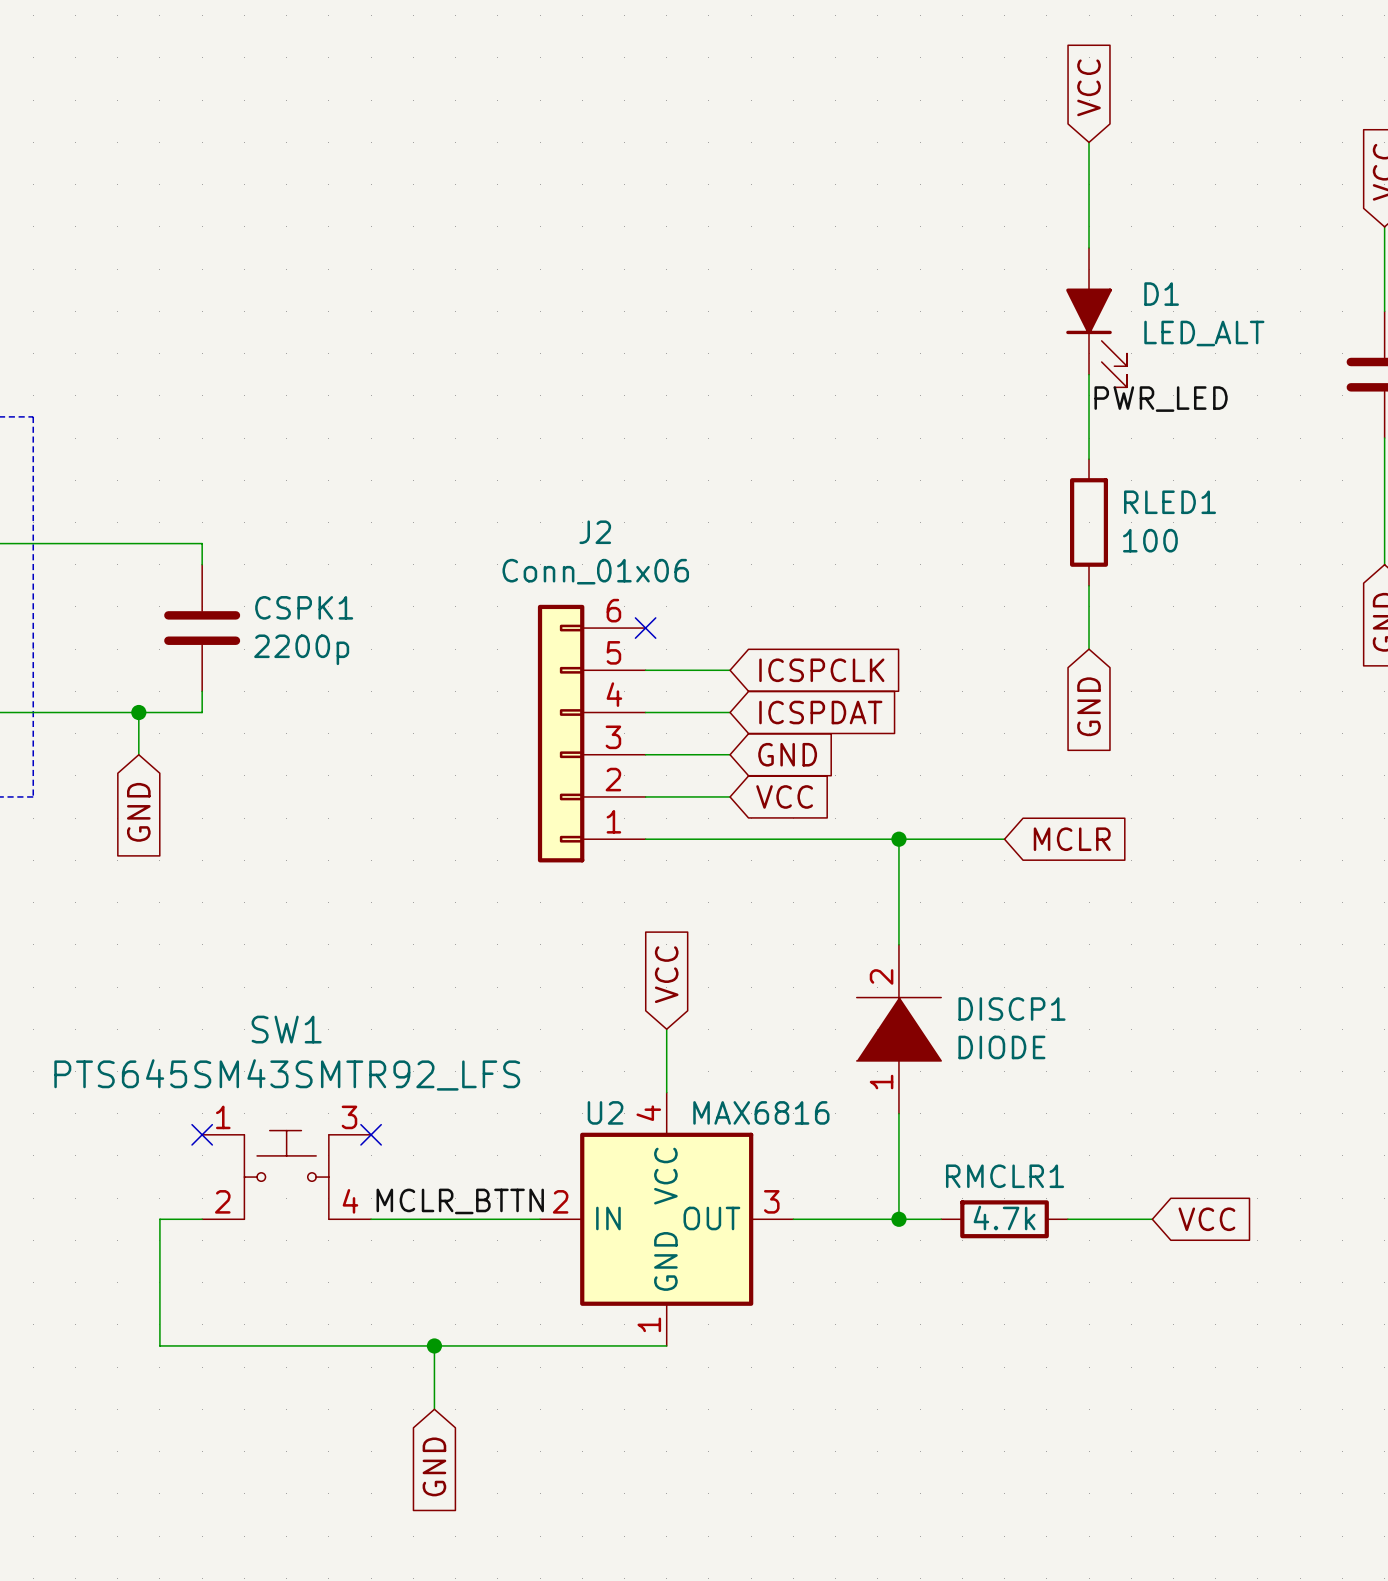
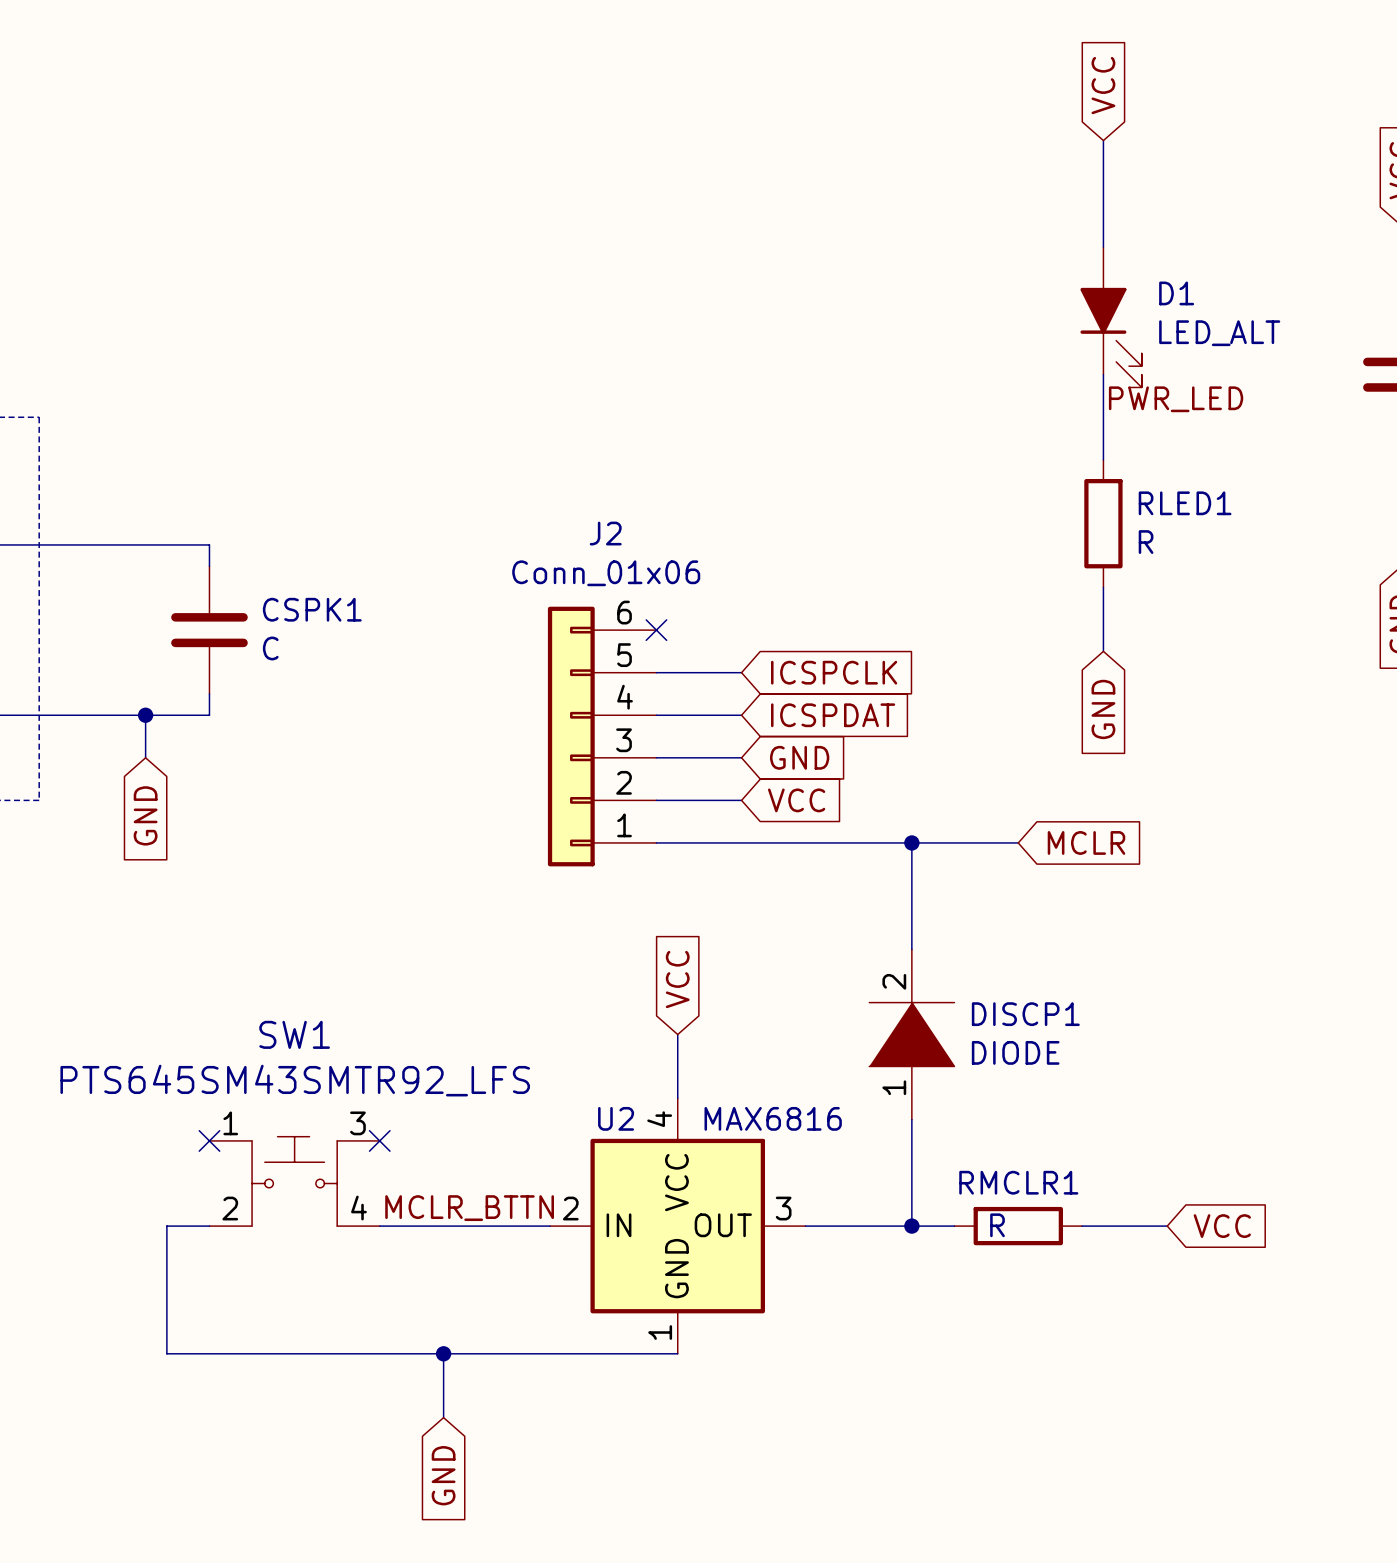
RLED1 value: 100 (1150, 540) -> R (1146, 542)
CSPK1 value: 2200p (301, 649) -> C (270, 648)
RMCLR1 value: 4.7k (1004, 1217) -> R (997, 1225)

